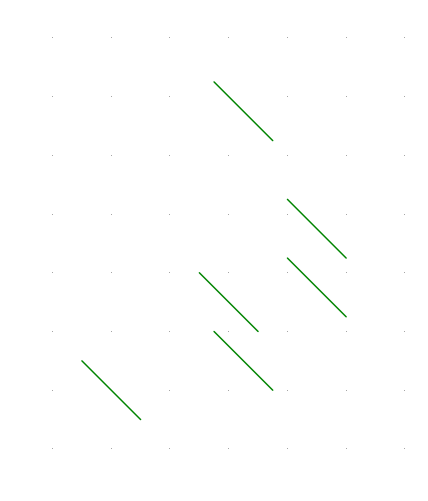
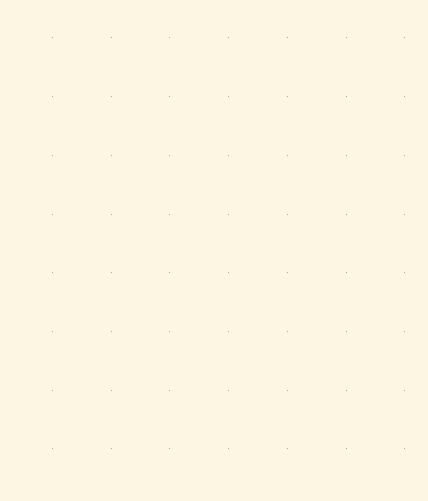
wire: (214, 81) (272, 140) -> none
wire: (287, 199) (346, 258) -> none
wire: (287, 258) (346, 316) -> none
wire: (199, 272) (258, 331) -> none
wire: (214, 331) (272, 390) -> none
wire: (81, 360) (140, 419) -> none

